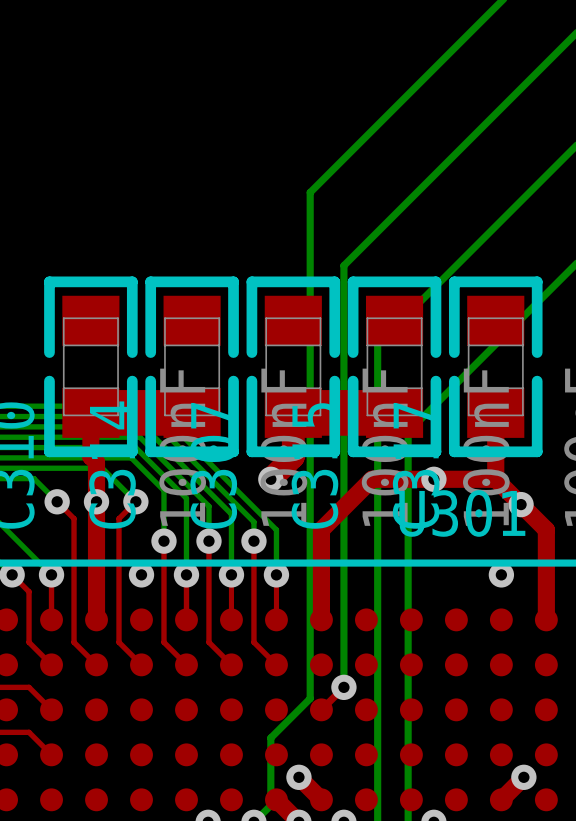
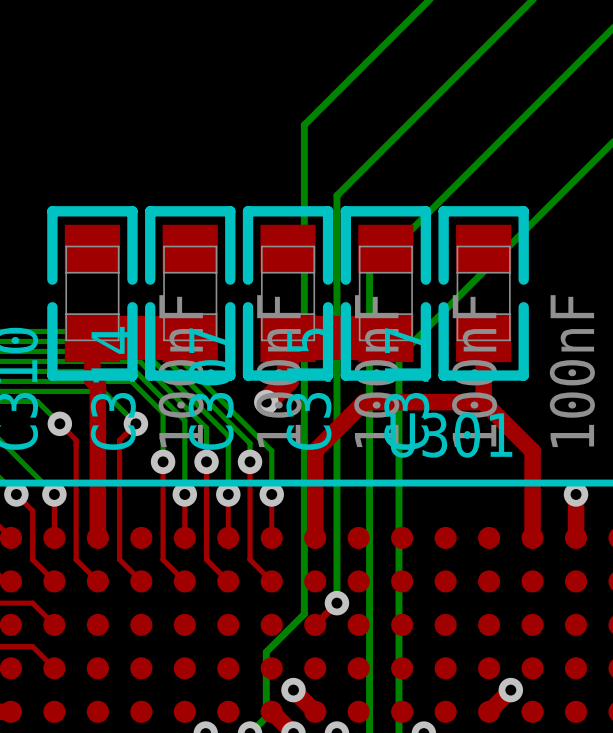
via: (433, 479) -> none
via: (96, 501) -> none
via: (521, 504) -> none
via: (141, 574) -> none
via: (501, 574) -> none

